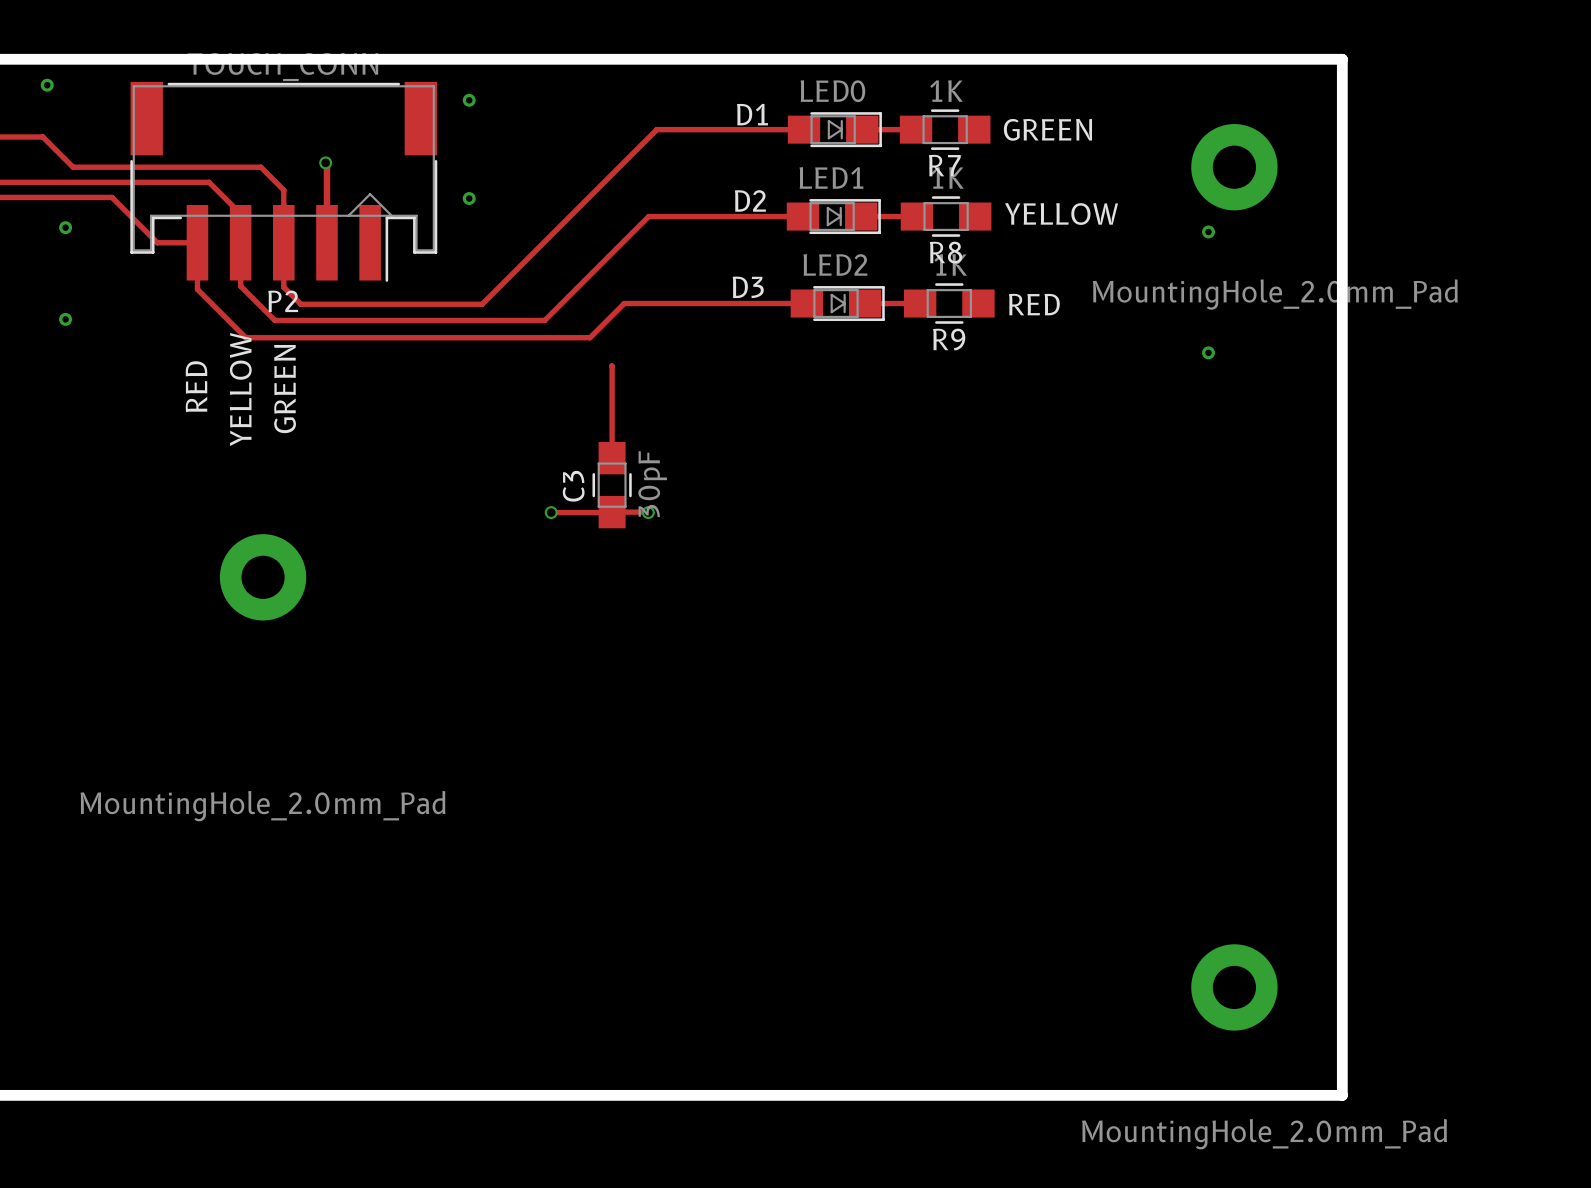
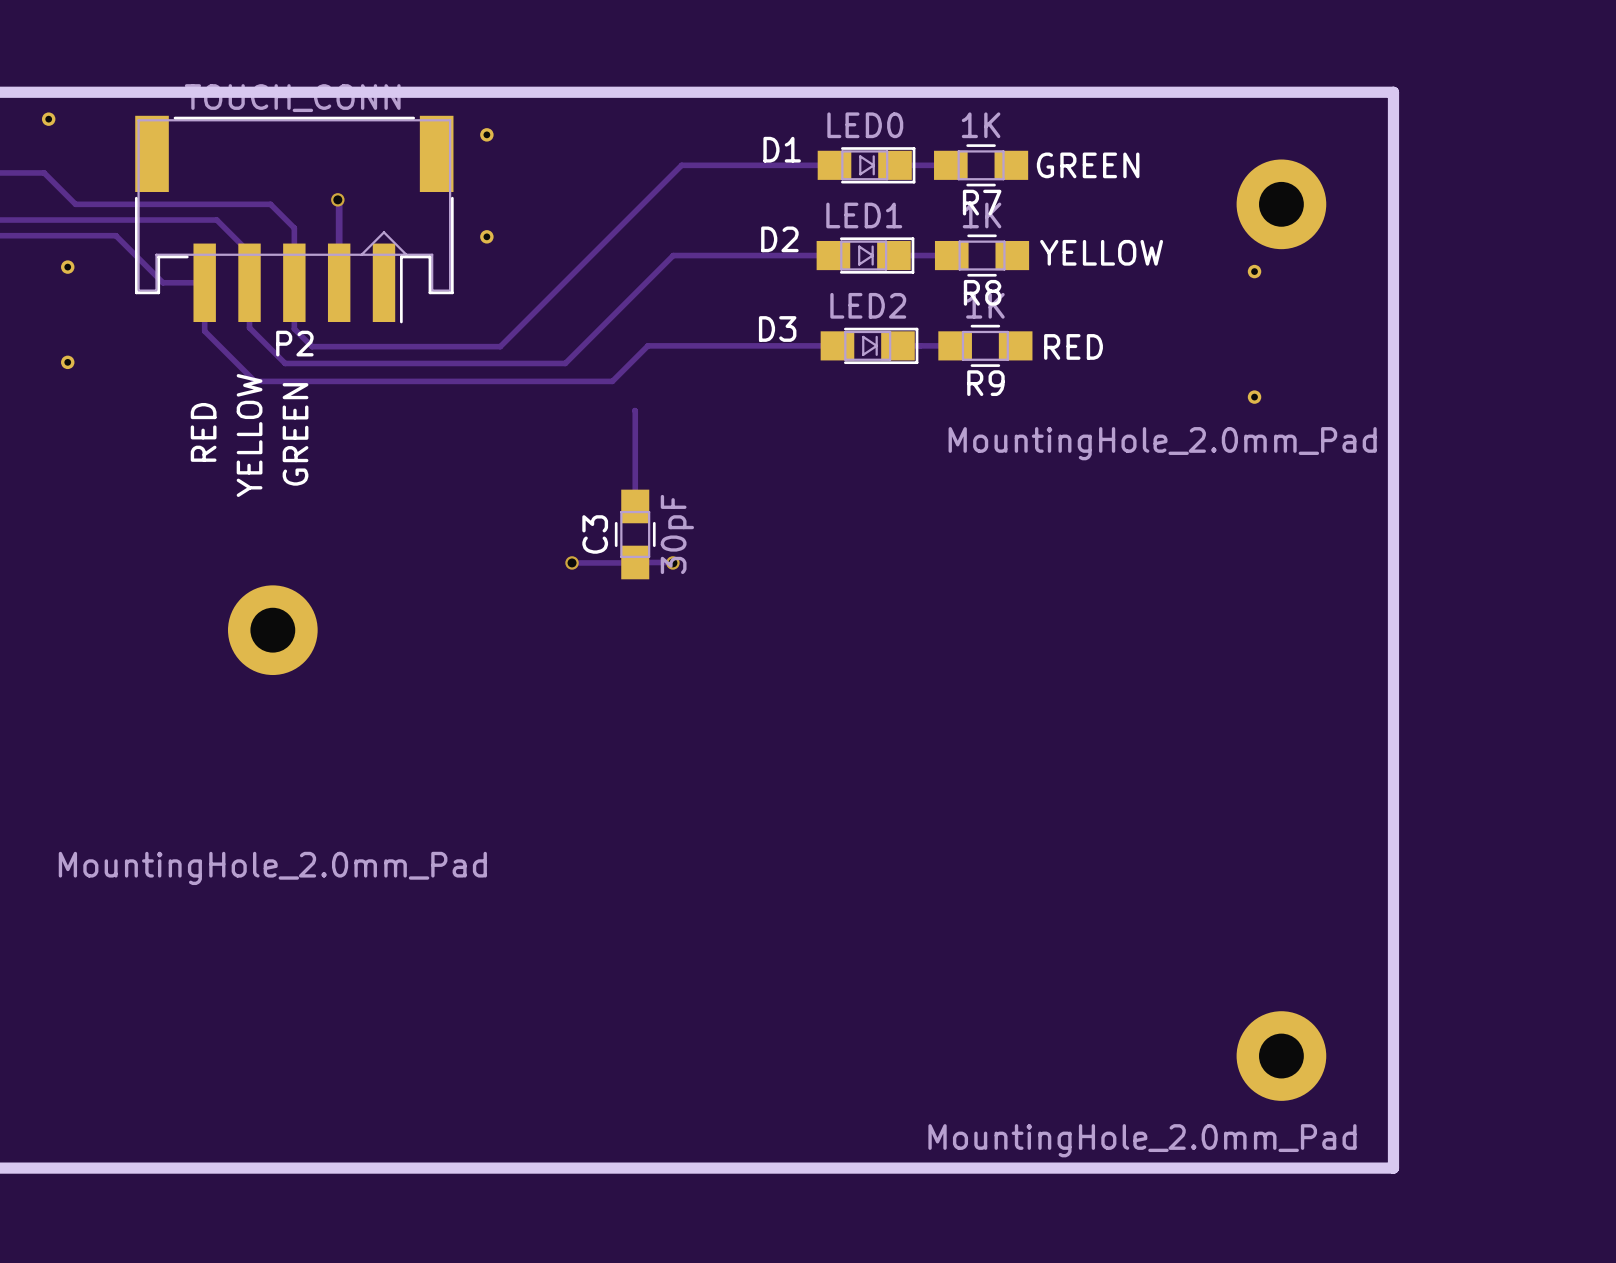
part value position: MountingHole_2.0mm_Pad (1275, 294) -> MountingHole_2.0mm_Pad (1162, 443)
part value position: MountingHole_2.0mm_Pad (1264, 1134) -> MountingHole_2.0mm_Pad (1142, 1140)

